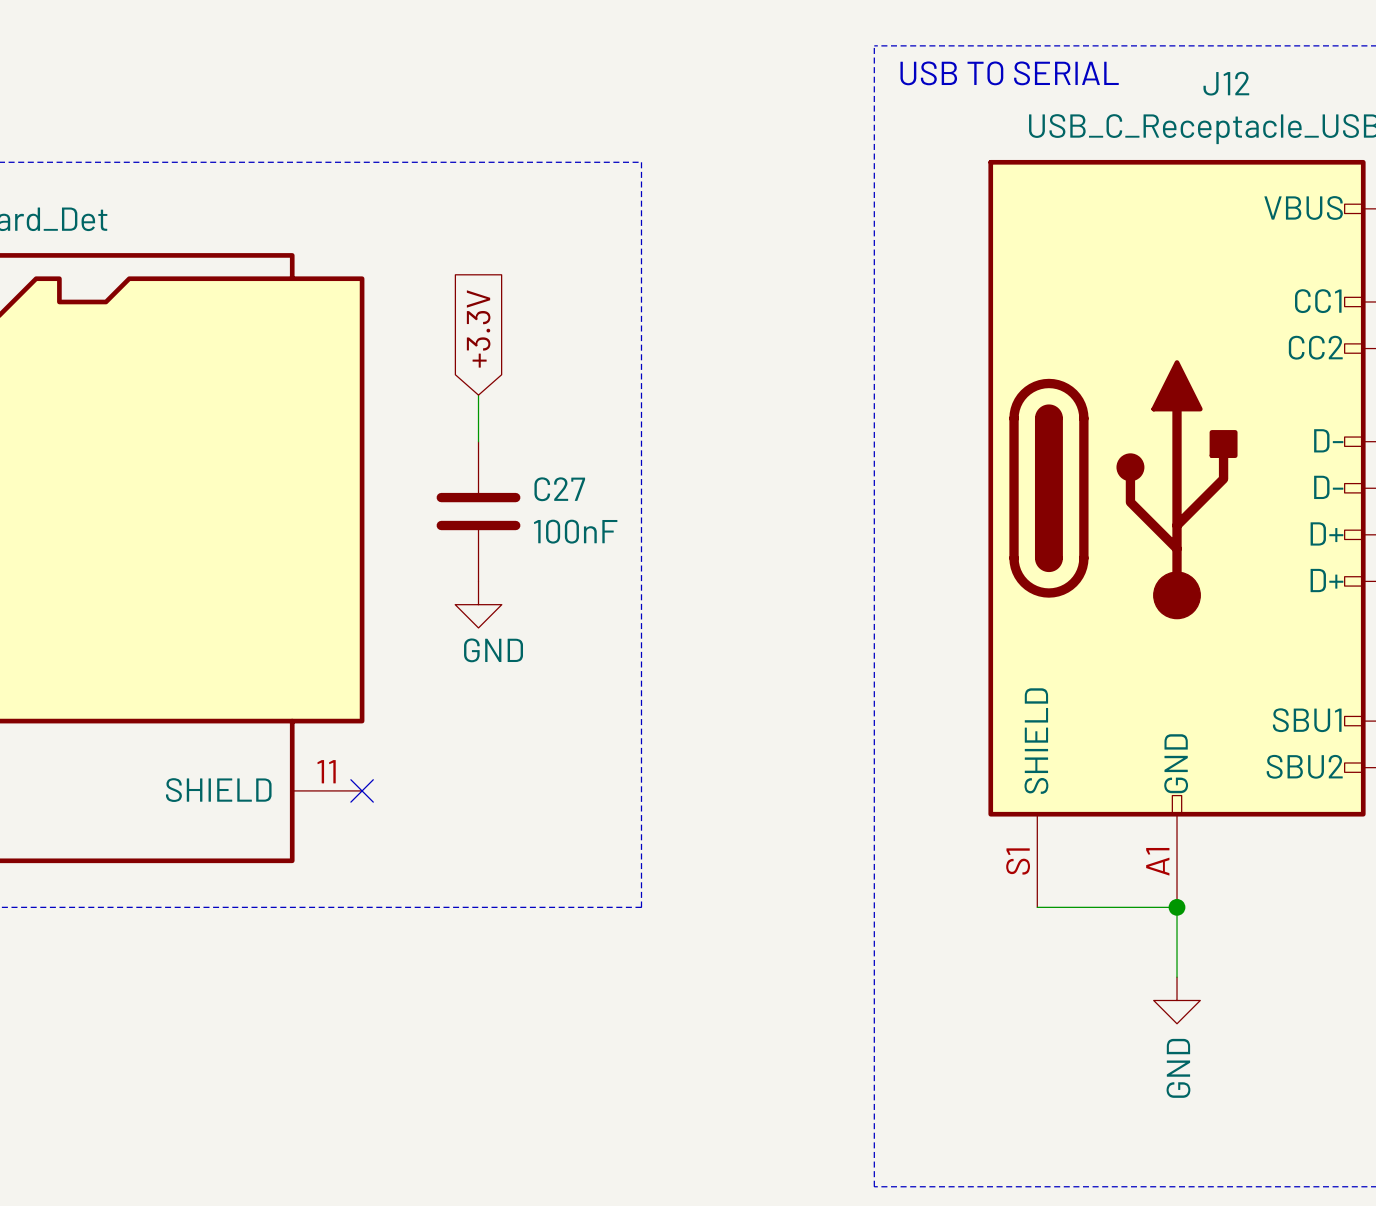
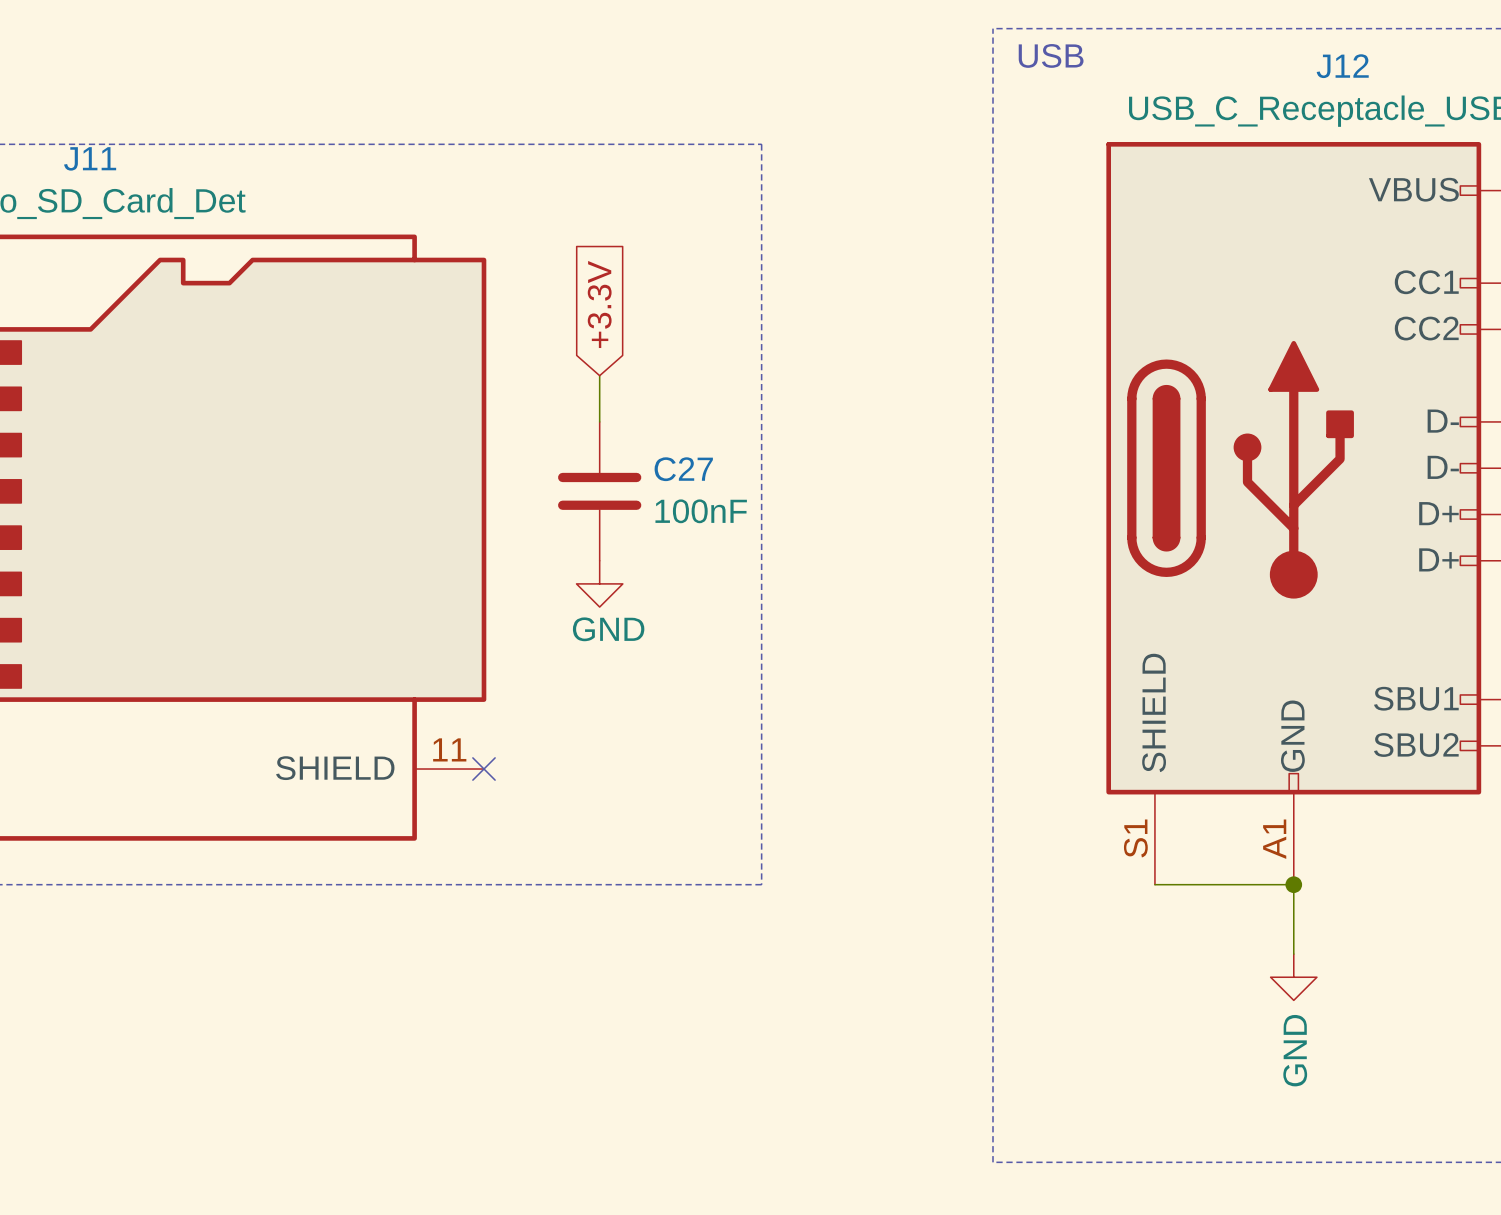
text: USB TO SERIAL (1009, 73) -> USB (1051, 55)

